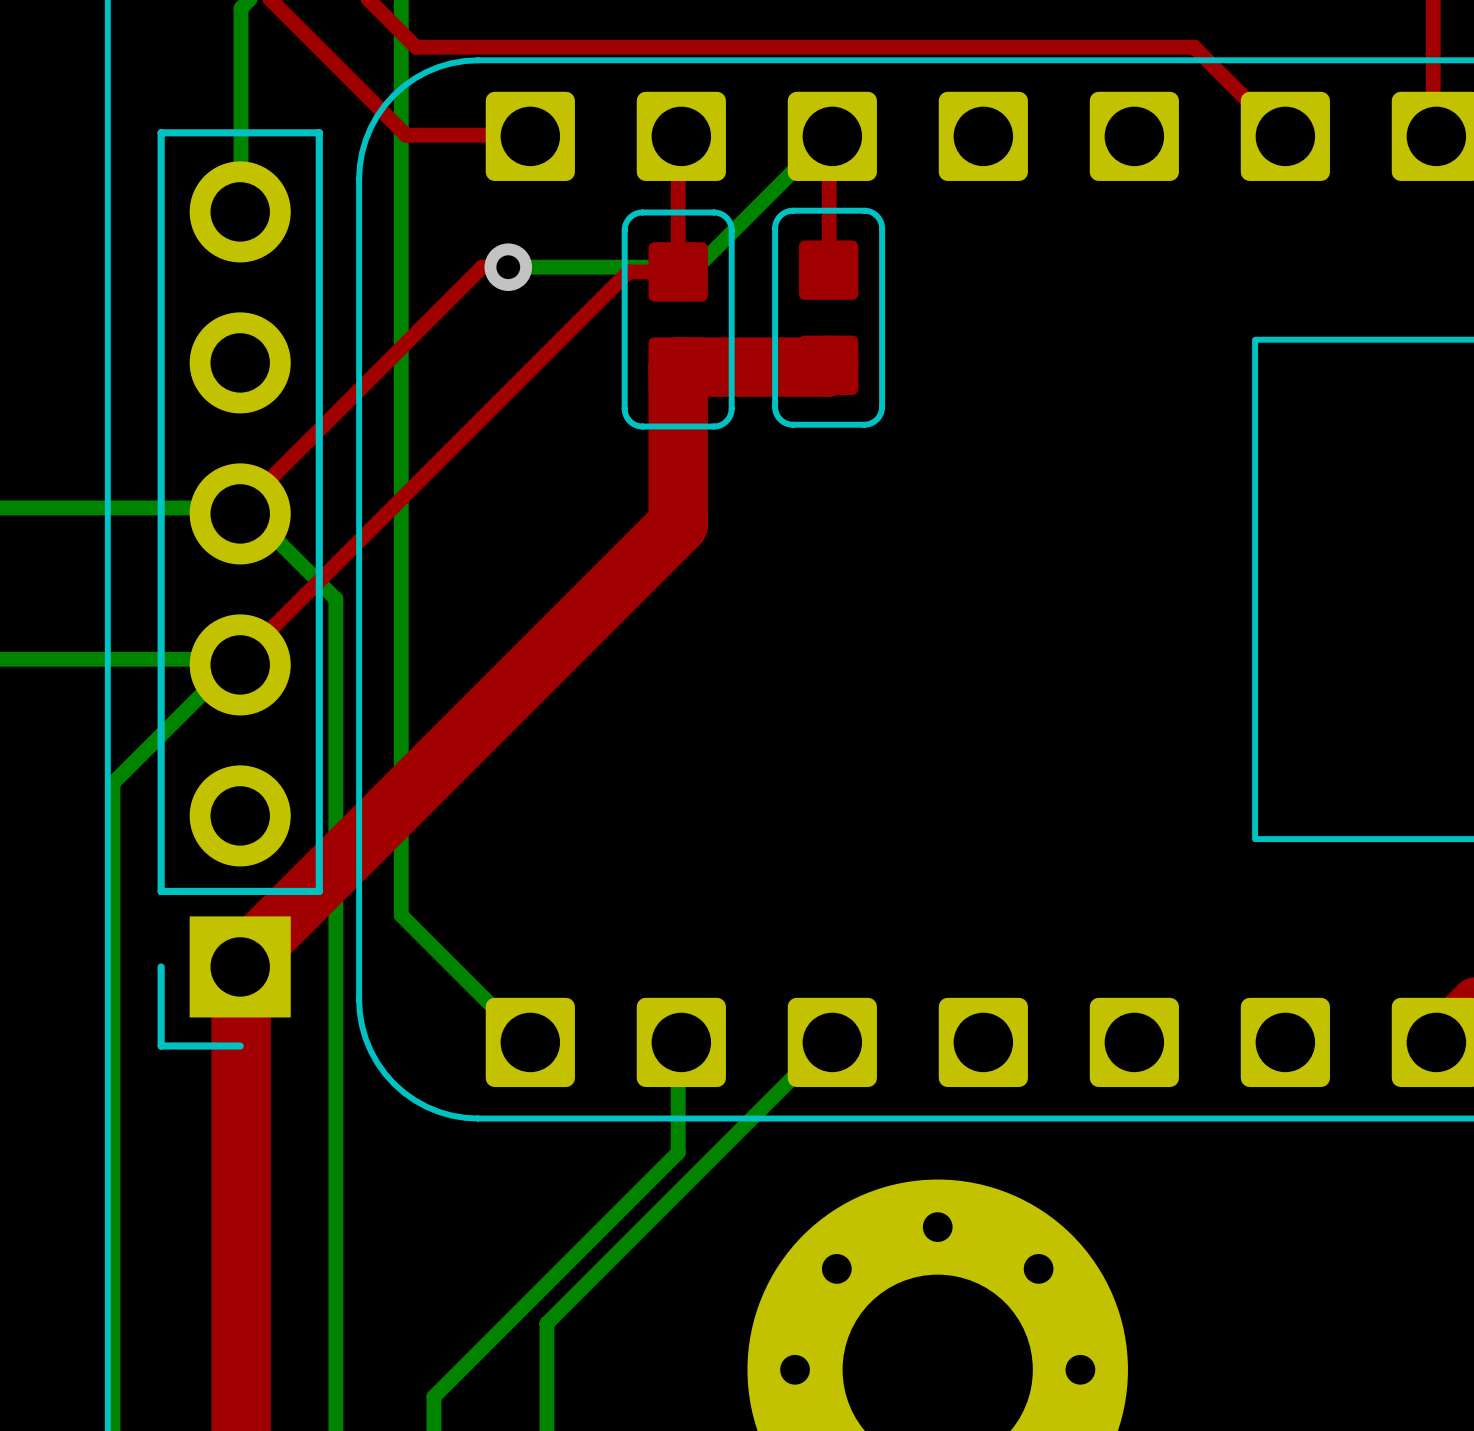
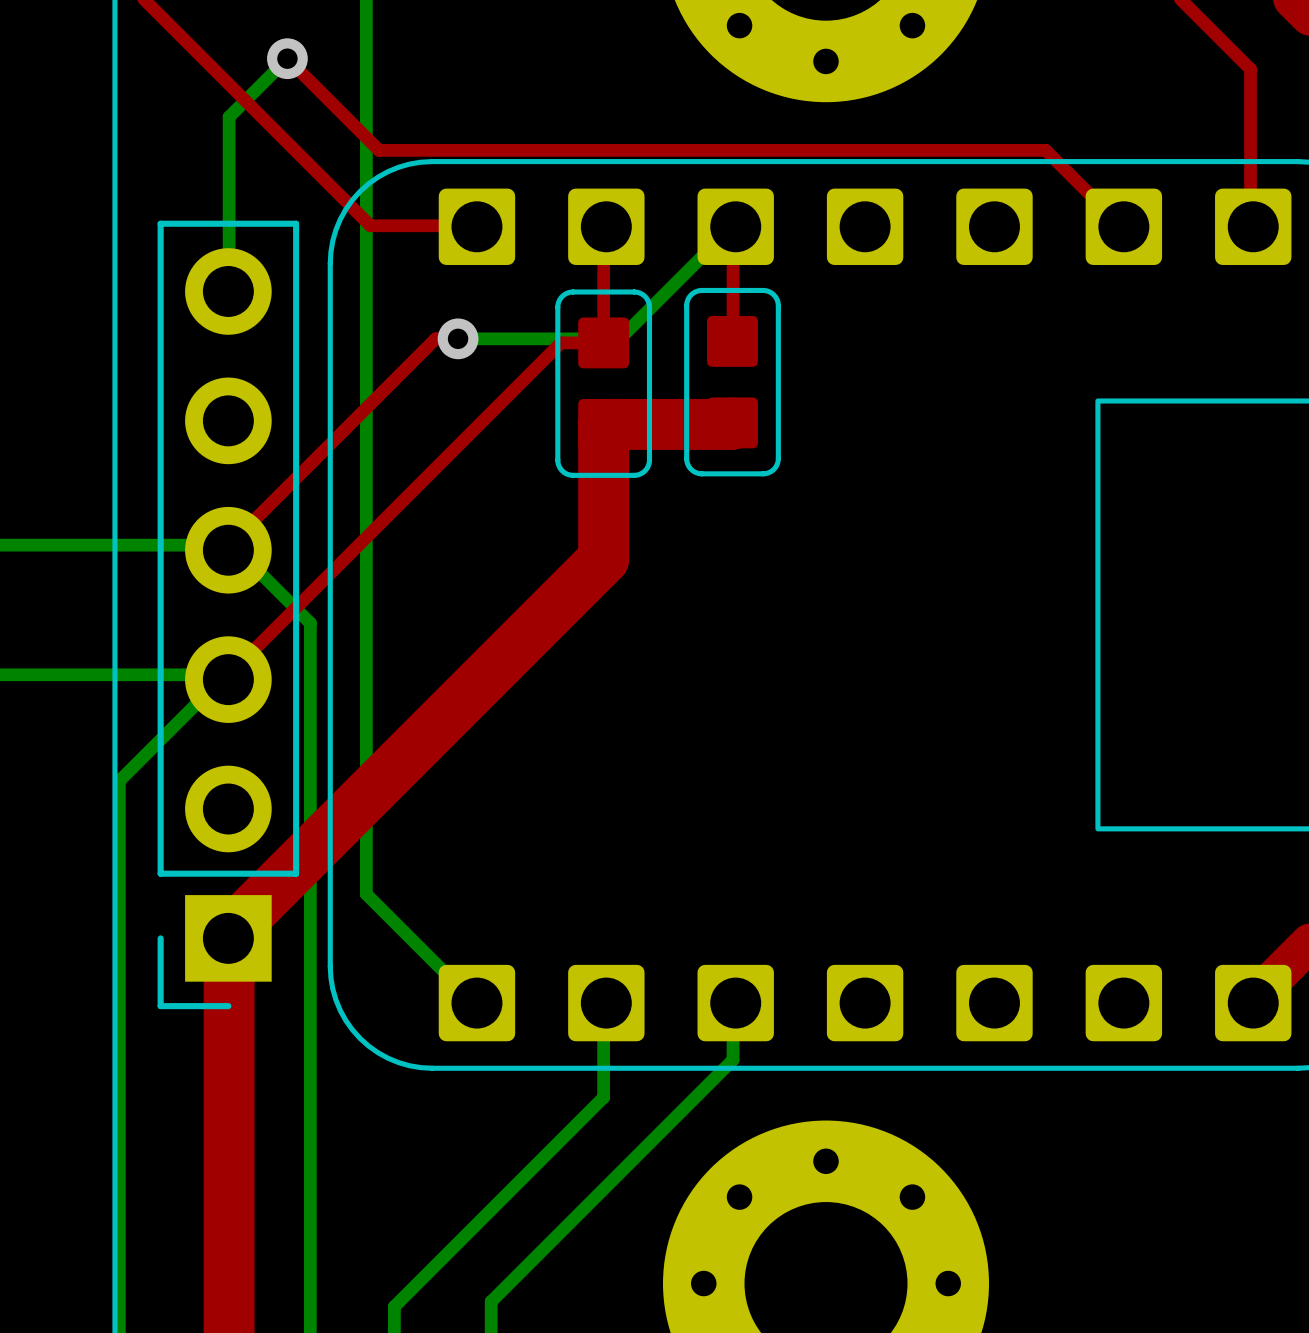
bottom track: (829, 1041) (546, 1323) (546, 1391) -> (733, 1002) (733, 1059) (491, 1301)

